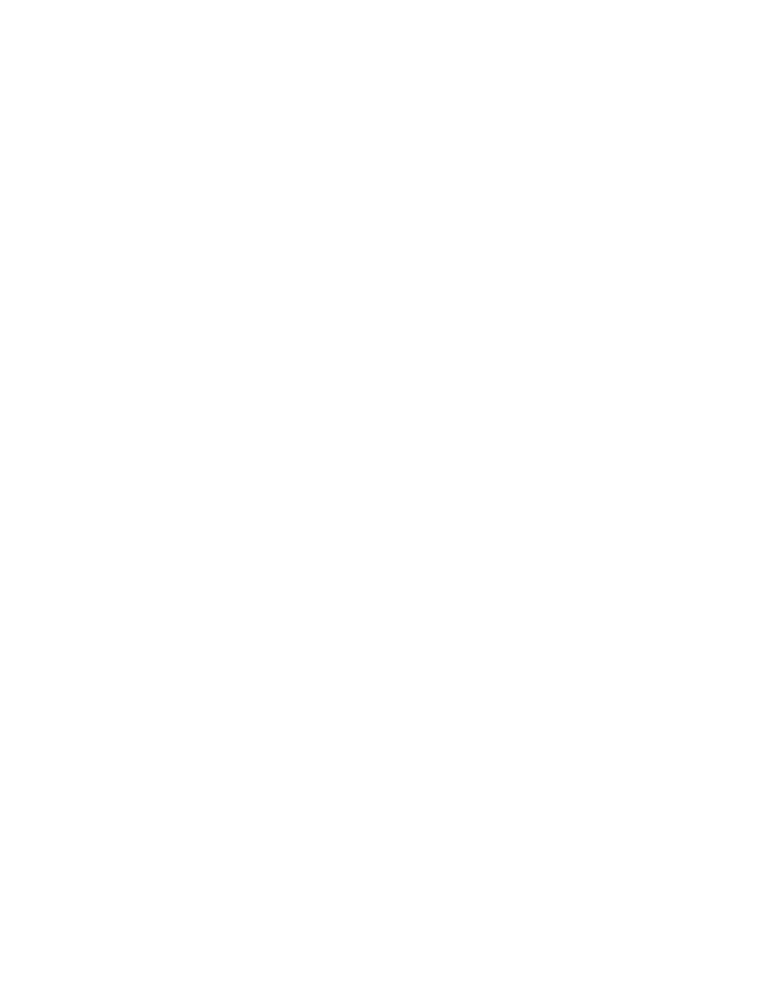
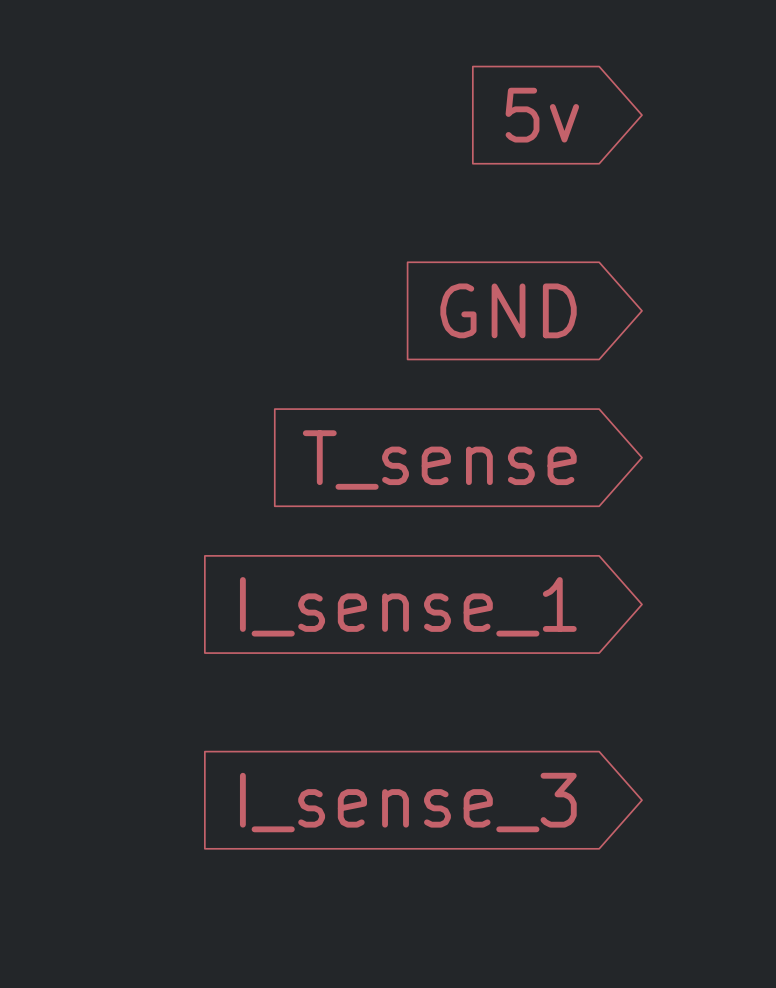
global label: none -> 5v (542, 115)
global label: none -> GND (508, 310)
global label: none -> T_sense (439, 460)
global label: none -> I_sense_1 (408, 606)
global label: none -> I_sense_3 (408, 802)

